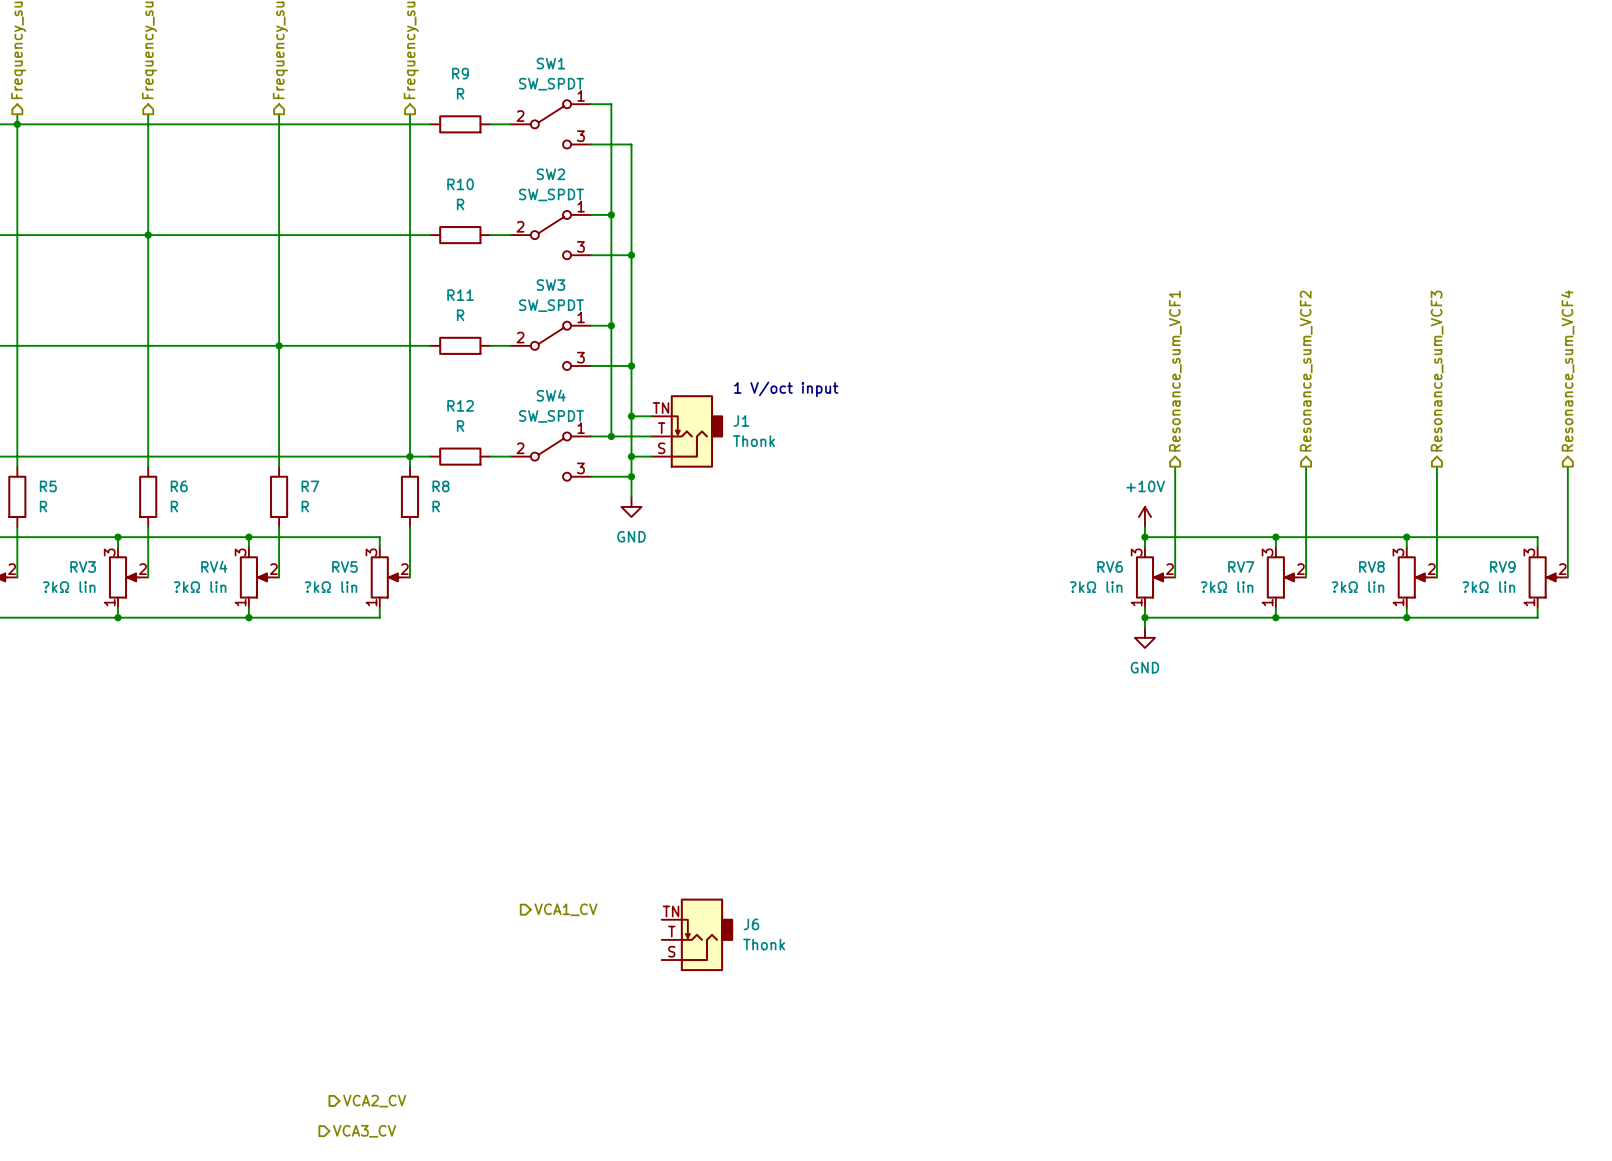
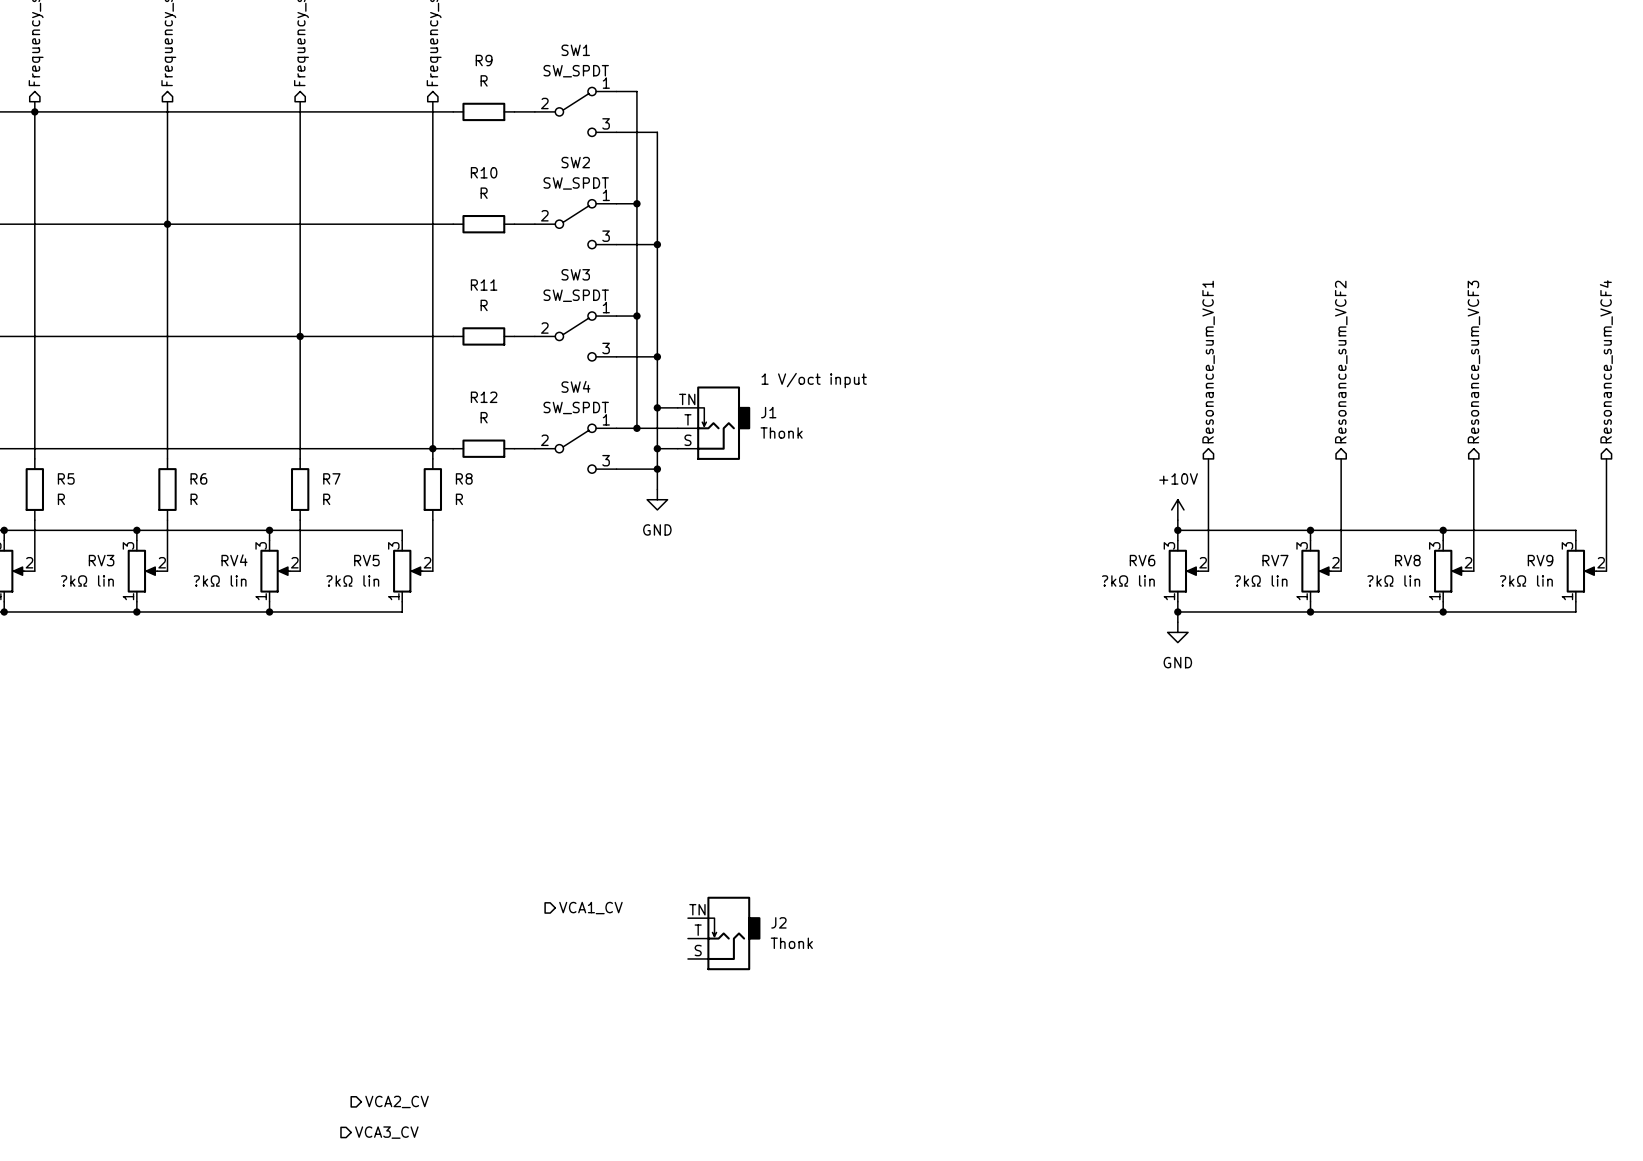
J6 name: J6 (751, 924) -> J2 (778, 922)

